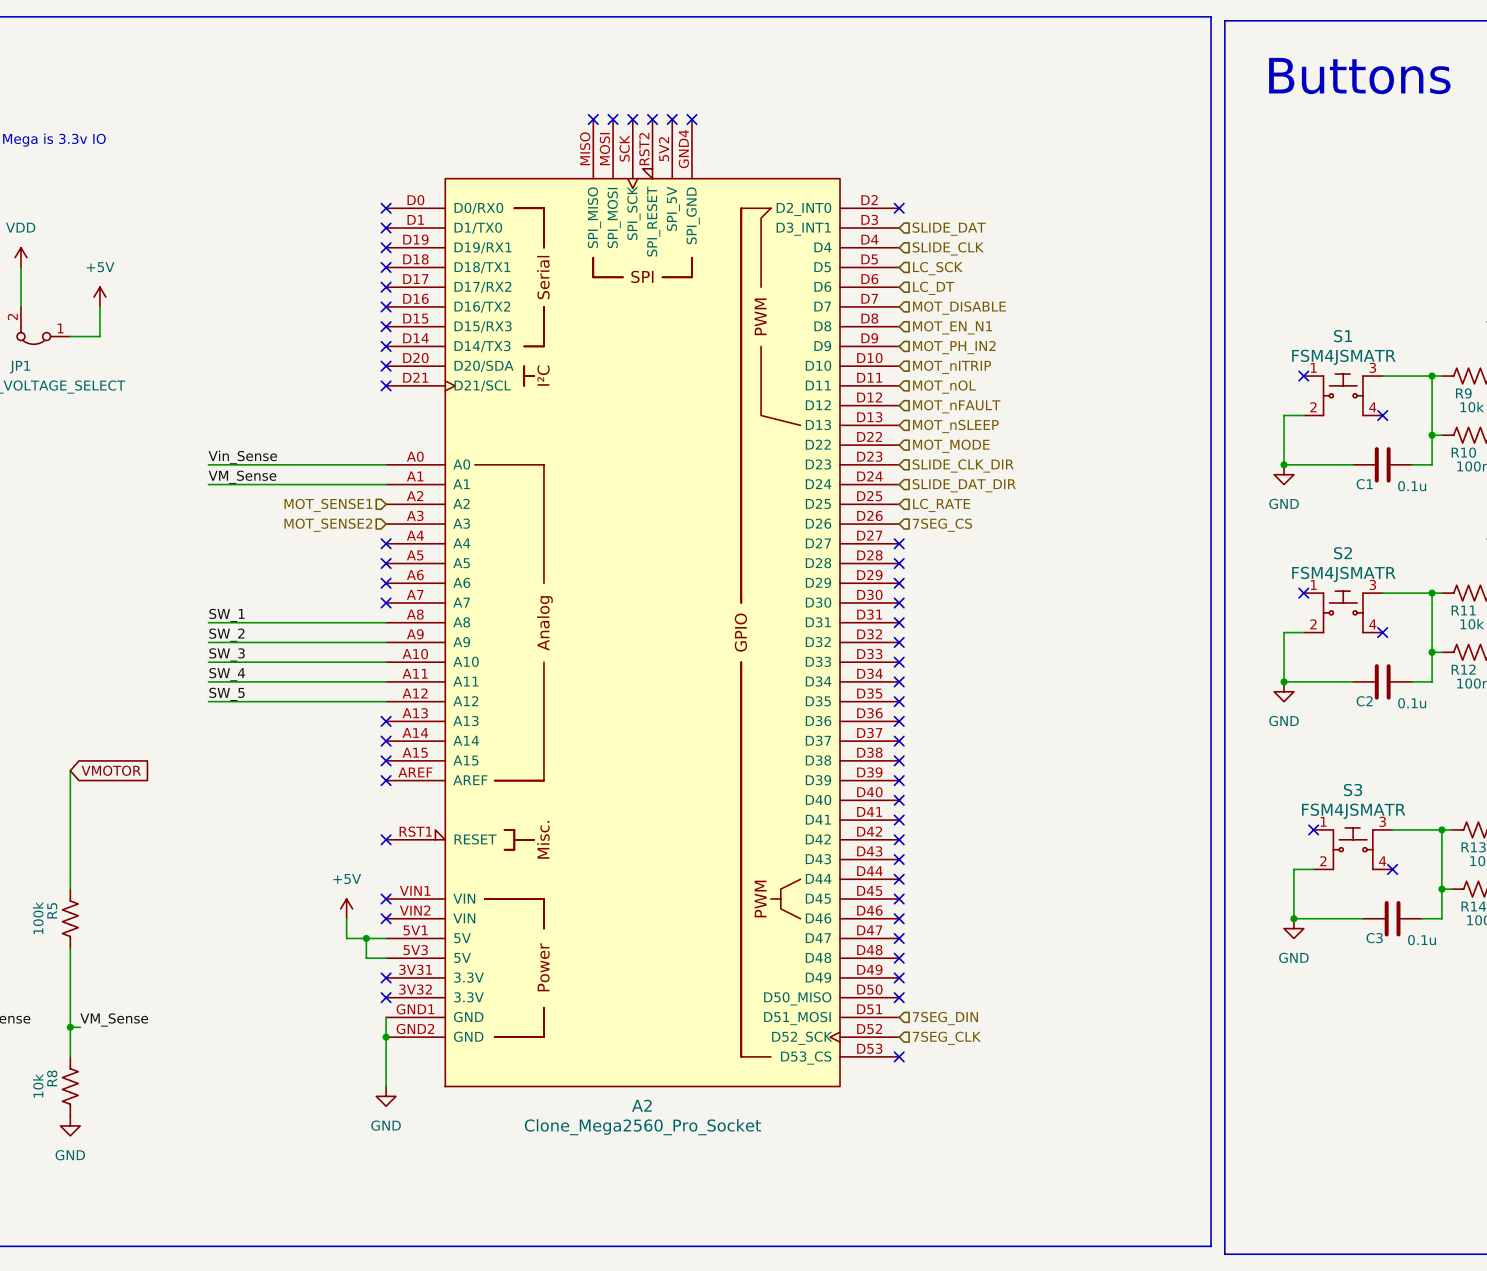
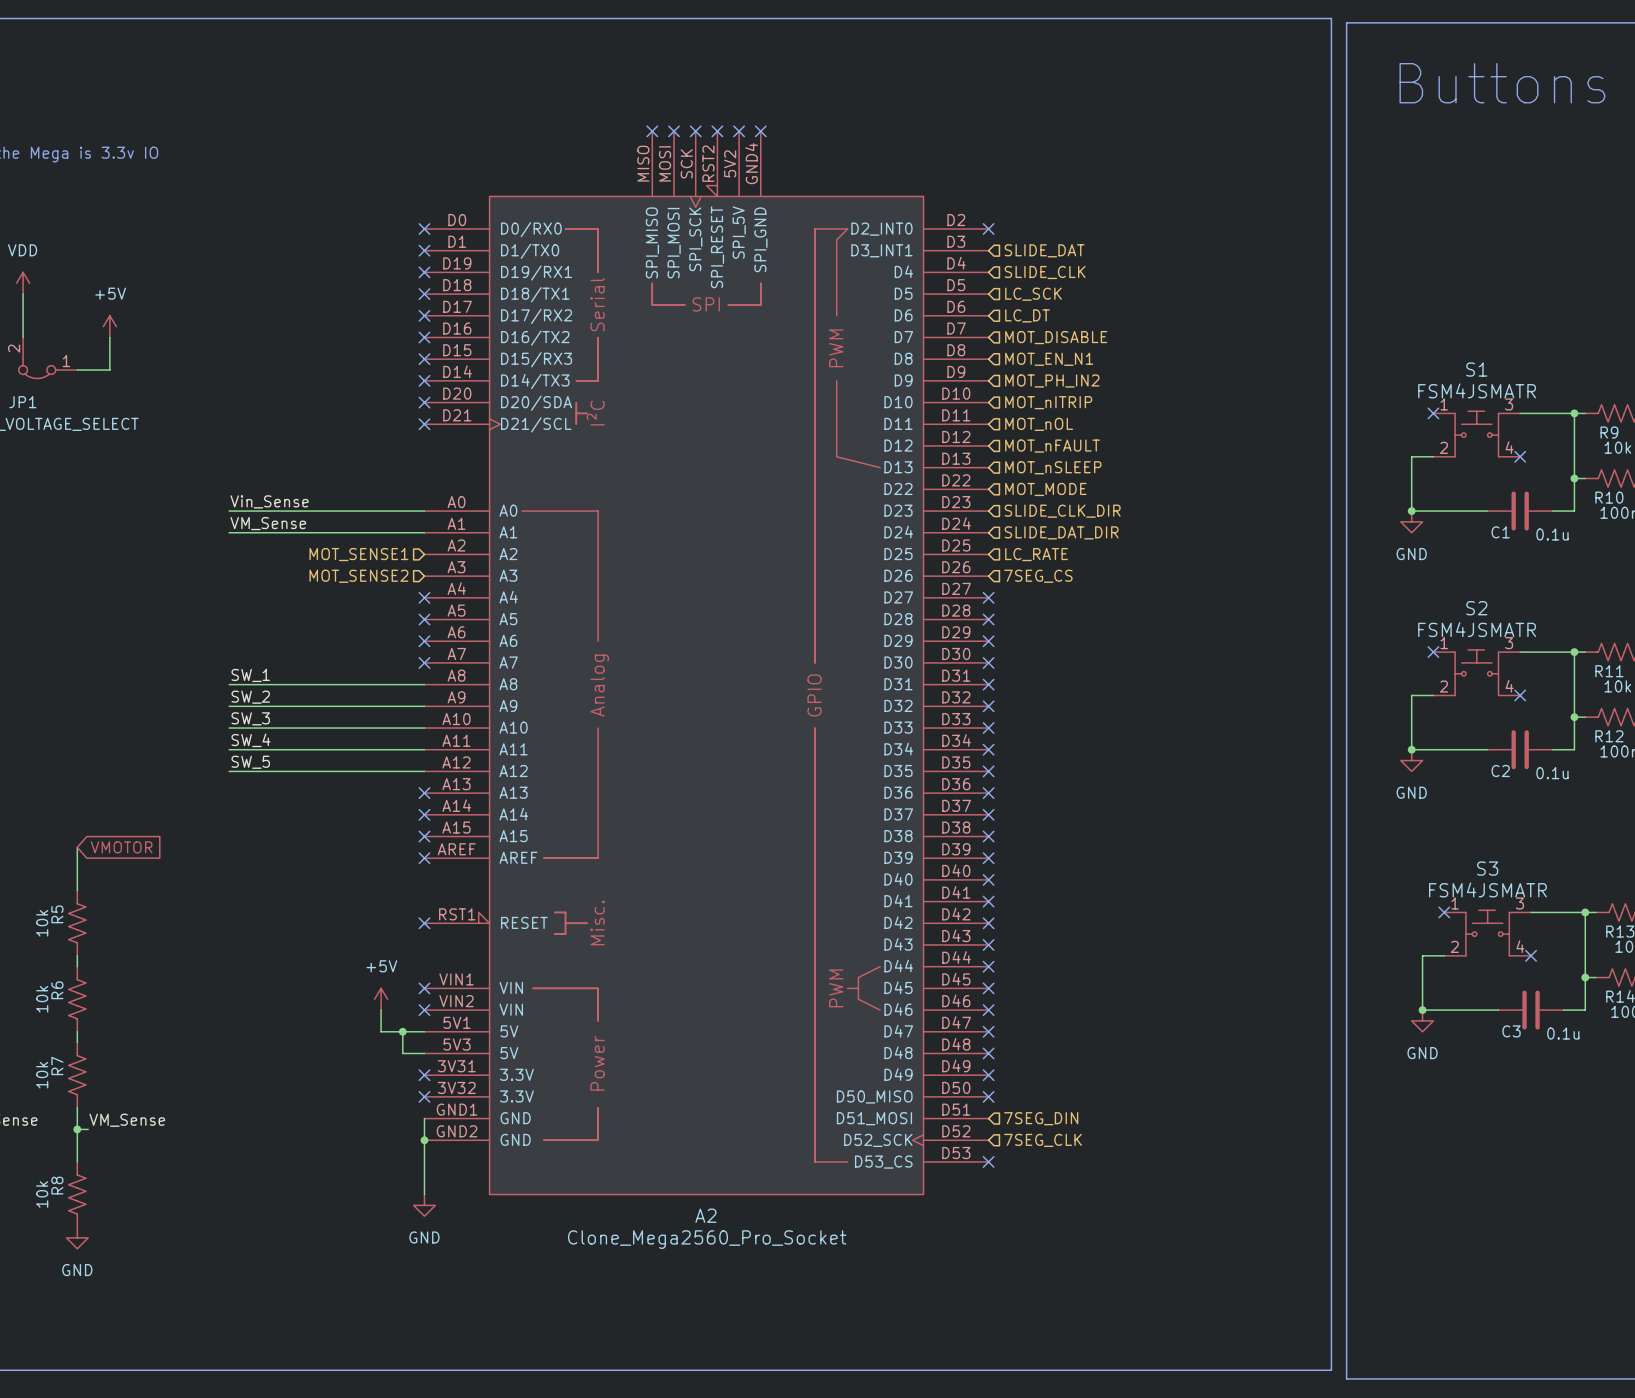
R6: none -> 10k (77, 999)
R5 value: 100k (38, 918) -> 10k (42, 923)
R5 position: (70, 918) -> (77, 923)
R7: none -> 10k (77, 1075)

